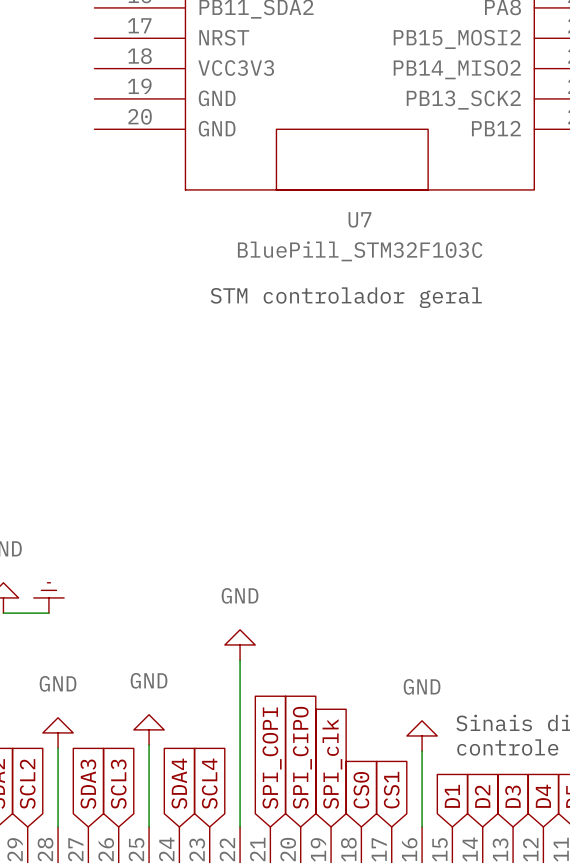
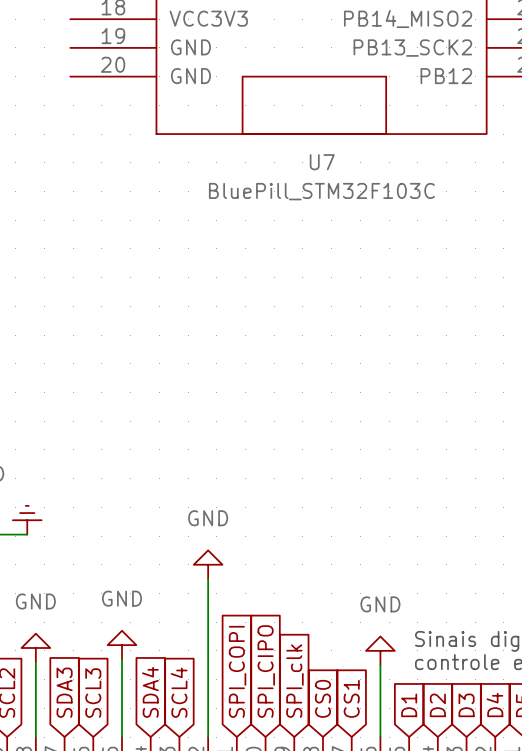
text: STM controlador geral (346, 297) -> none

